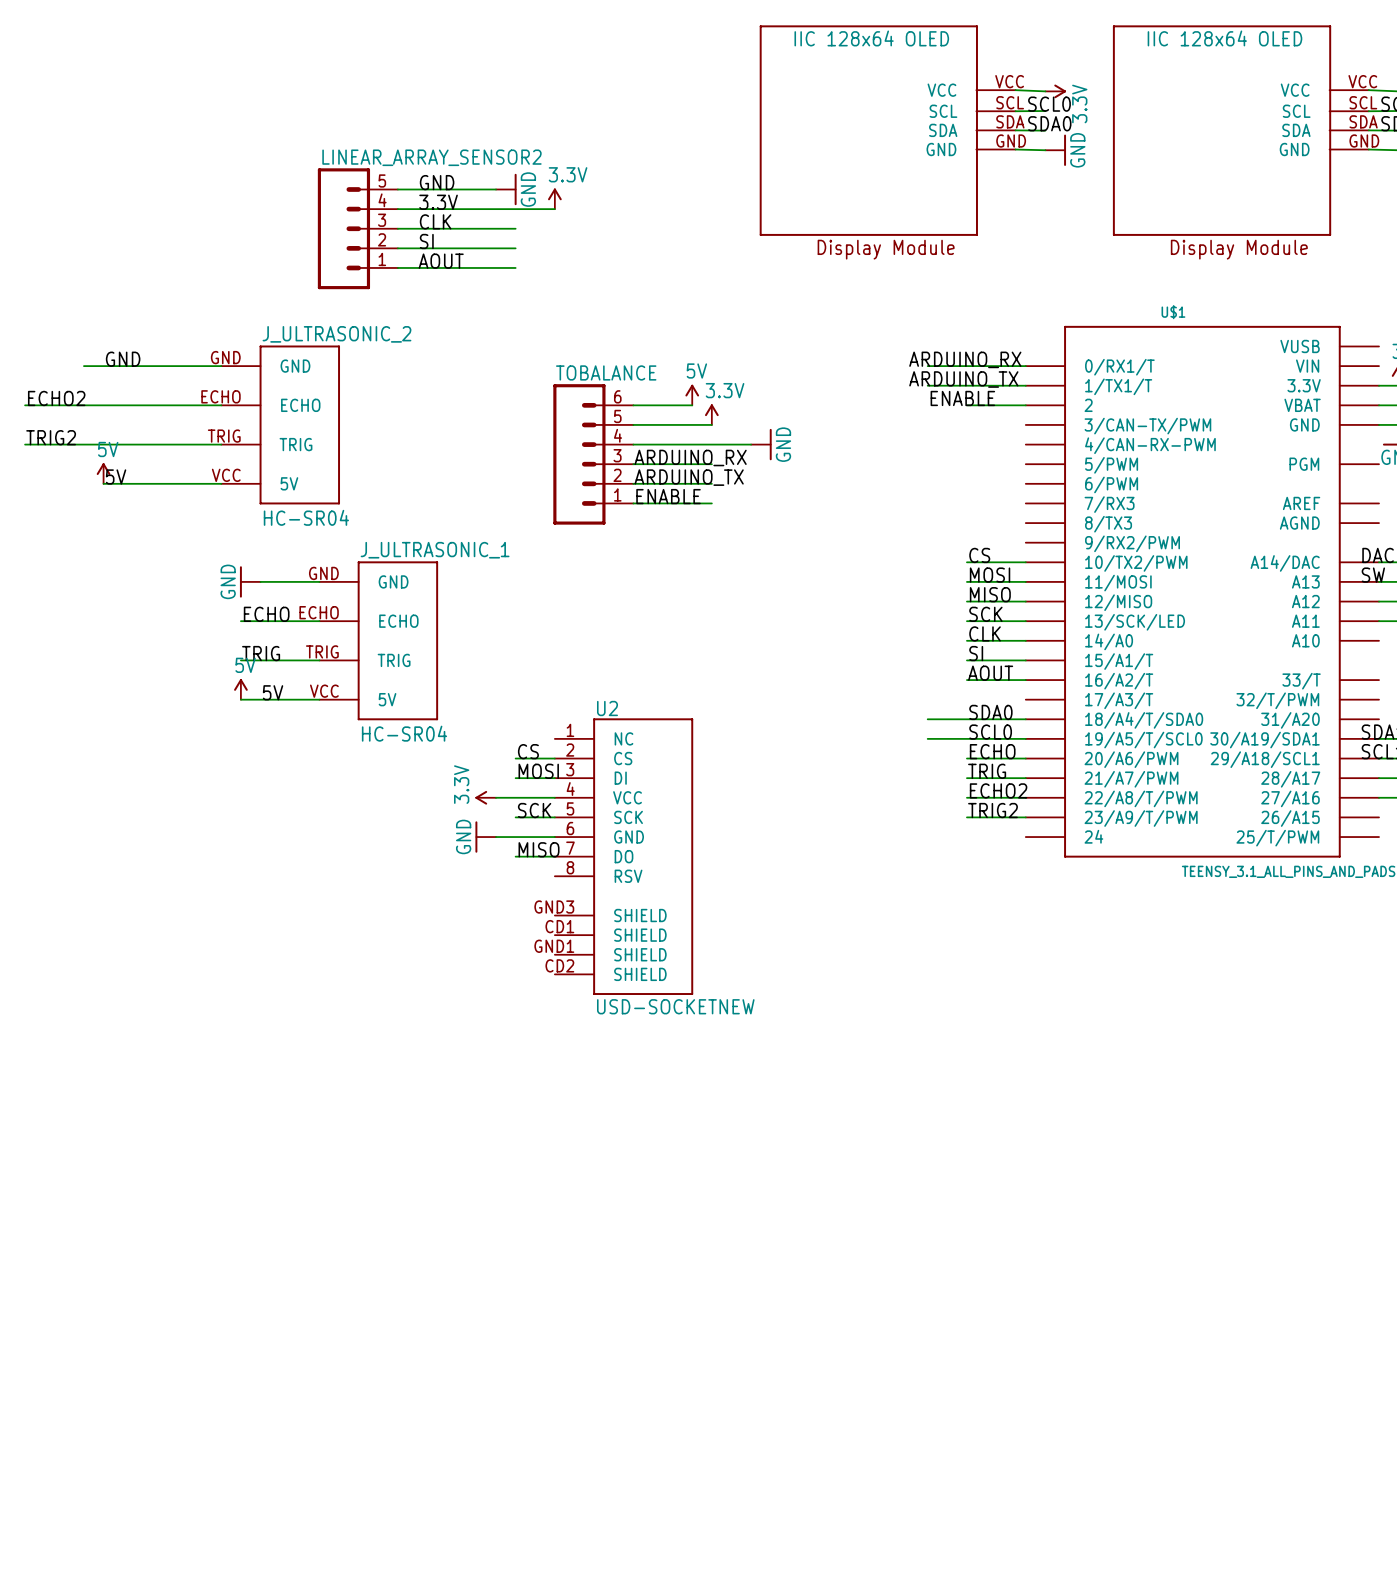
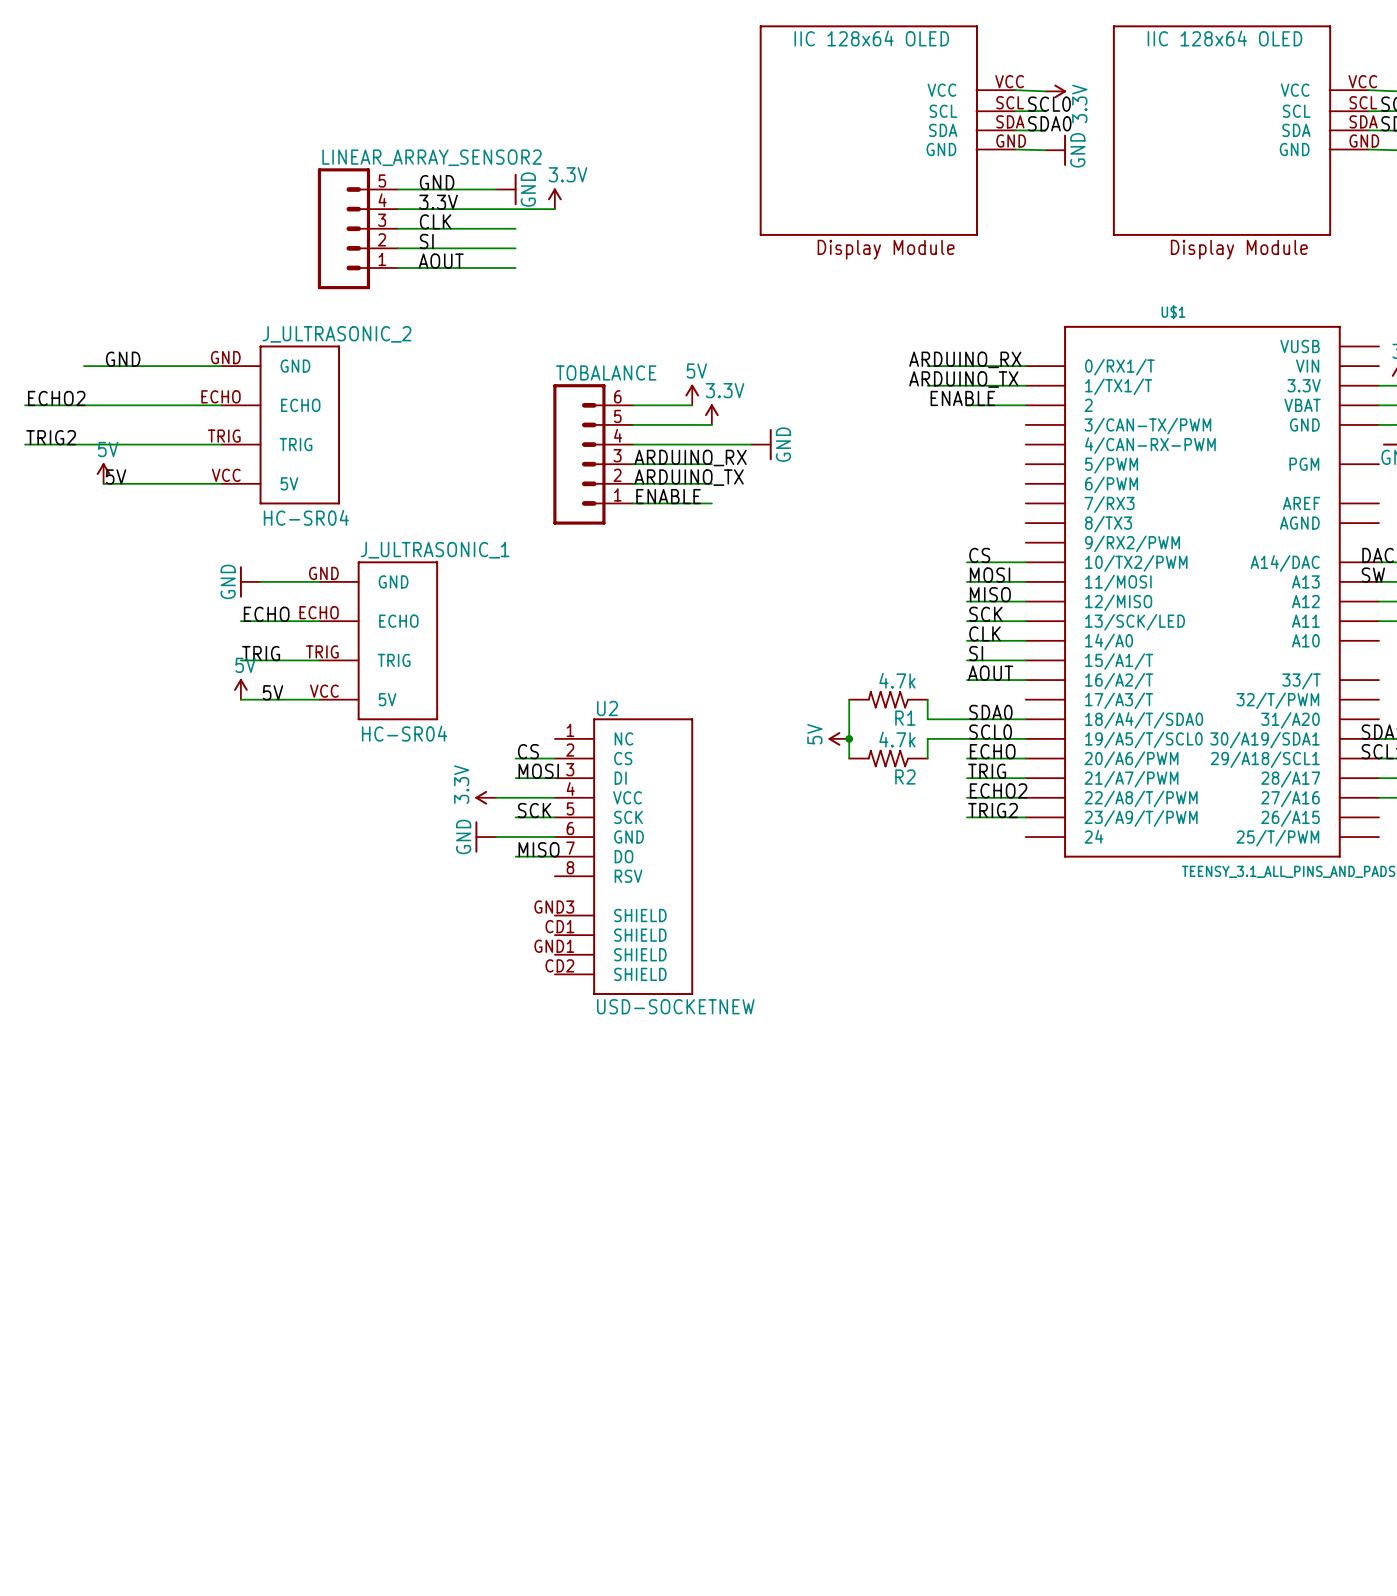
wire: none -> (849, 699) (849, 758)
R1: none -> 4.7k (888, 699)
wire: none -> (927, 699) (927, 719)
power symbol: none -> 5V (838, 738)
junction: none -> (849, 738)
wire: none -> (927, 738) (927, 758)
R2: none -> 4.7k (888, 758)

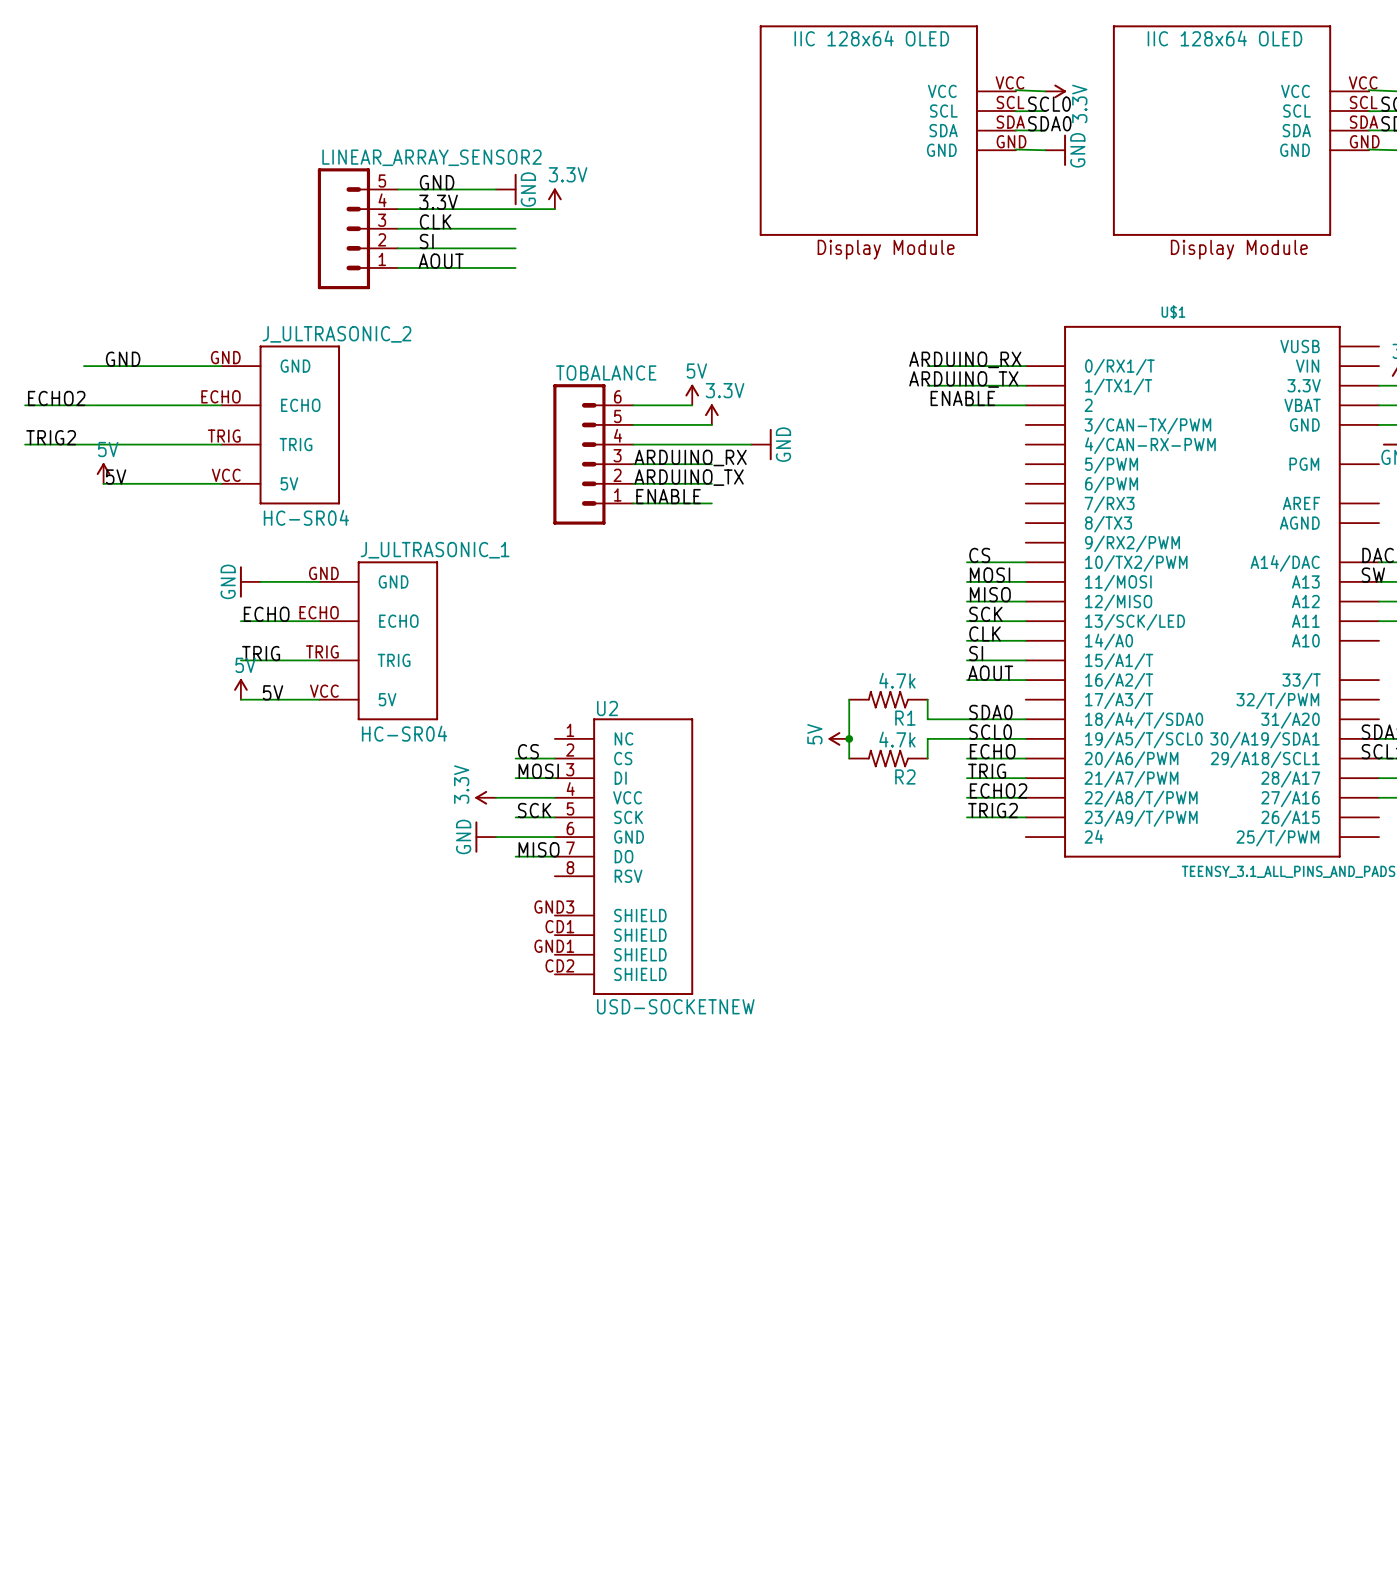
part symbol: [759, 25, 1016, 236] -> [759, 25, 1017, 236]
part symbol: [1112, 25, 1369, 236] -> [1112, 25, 1370, 236]

